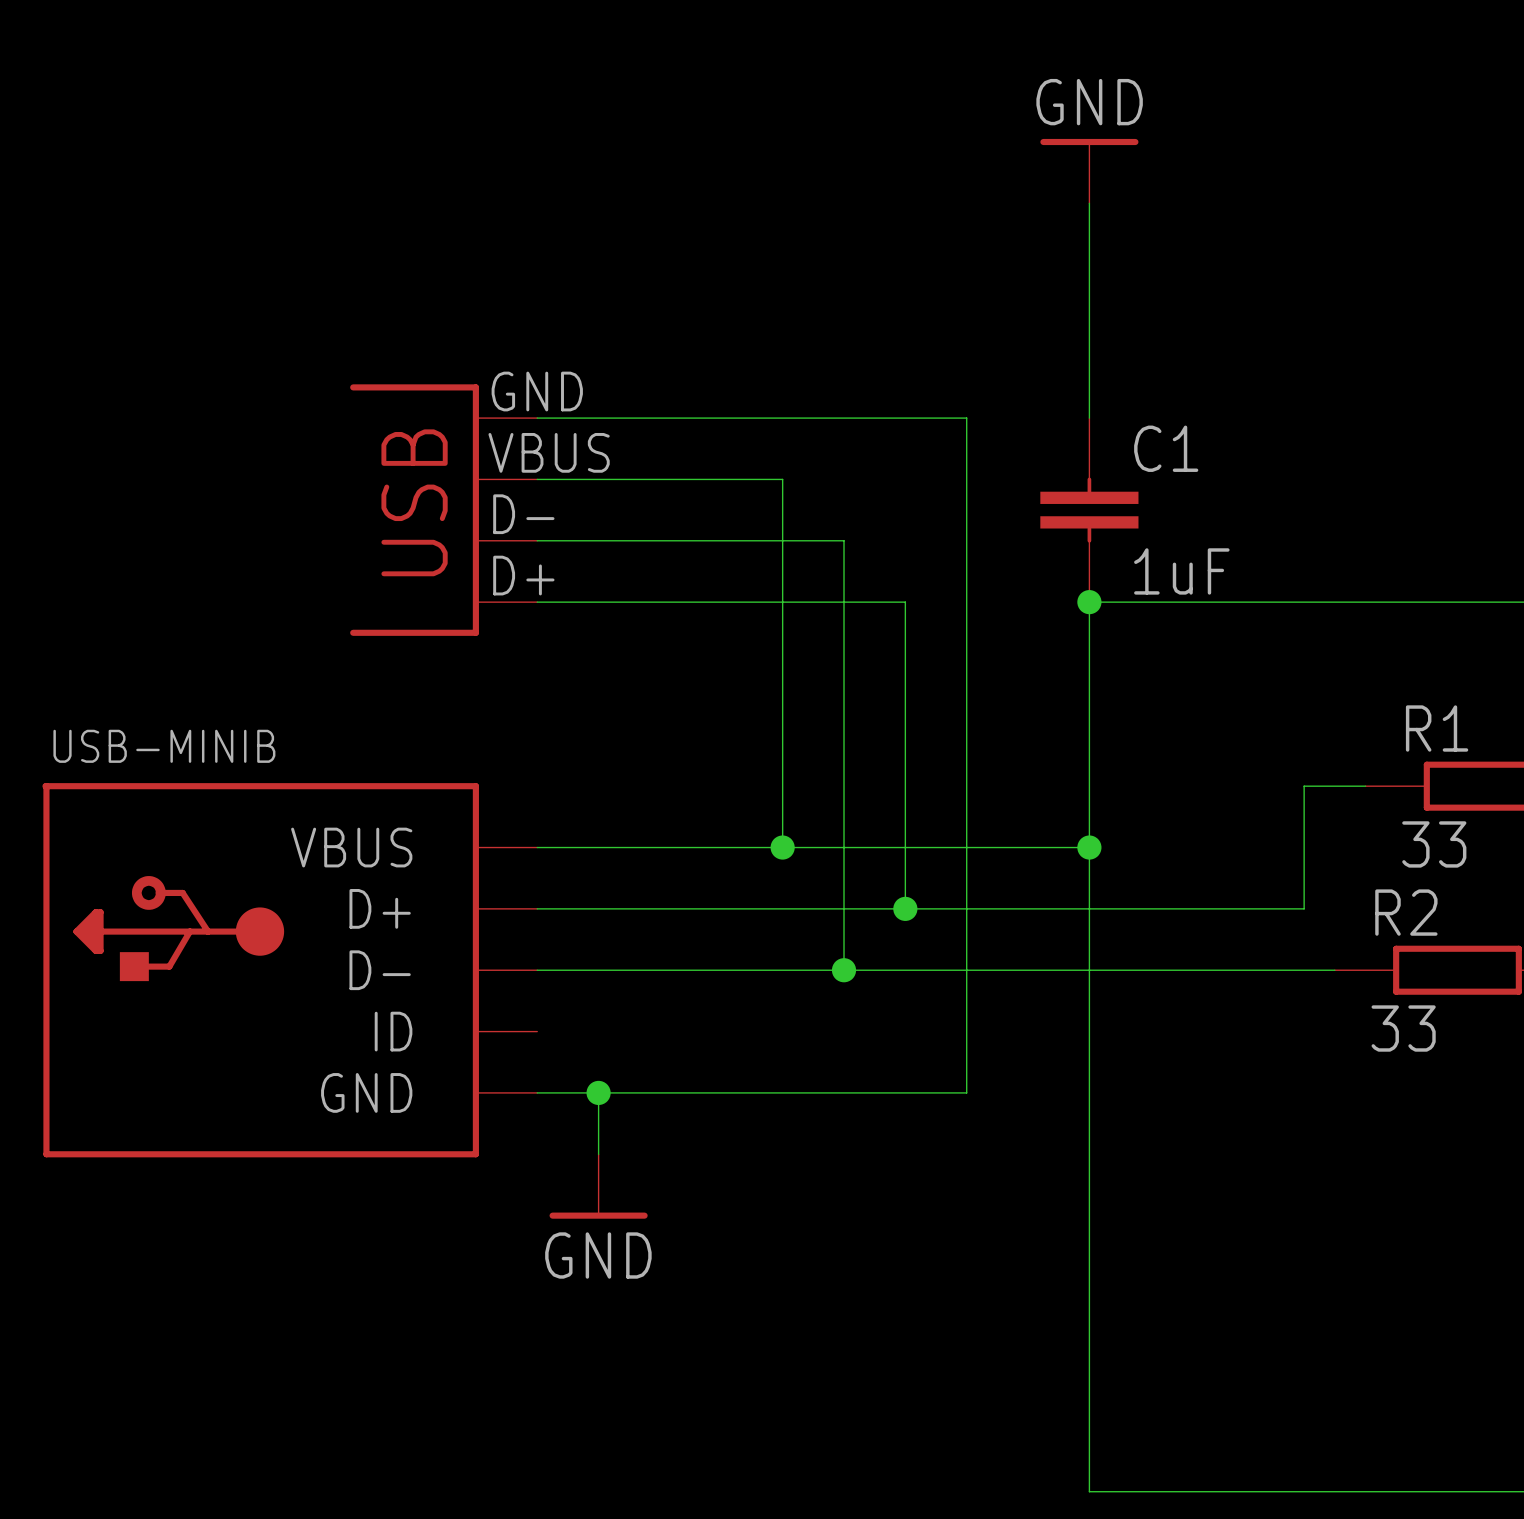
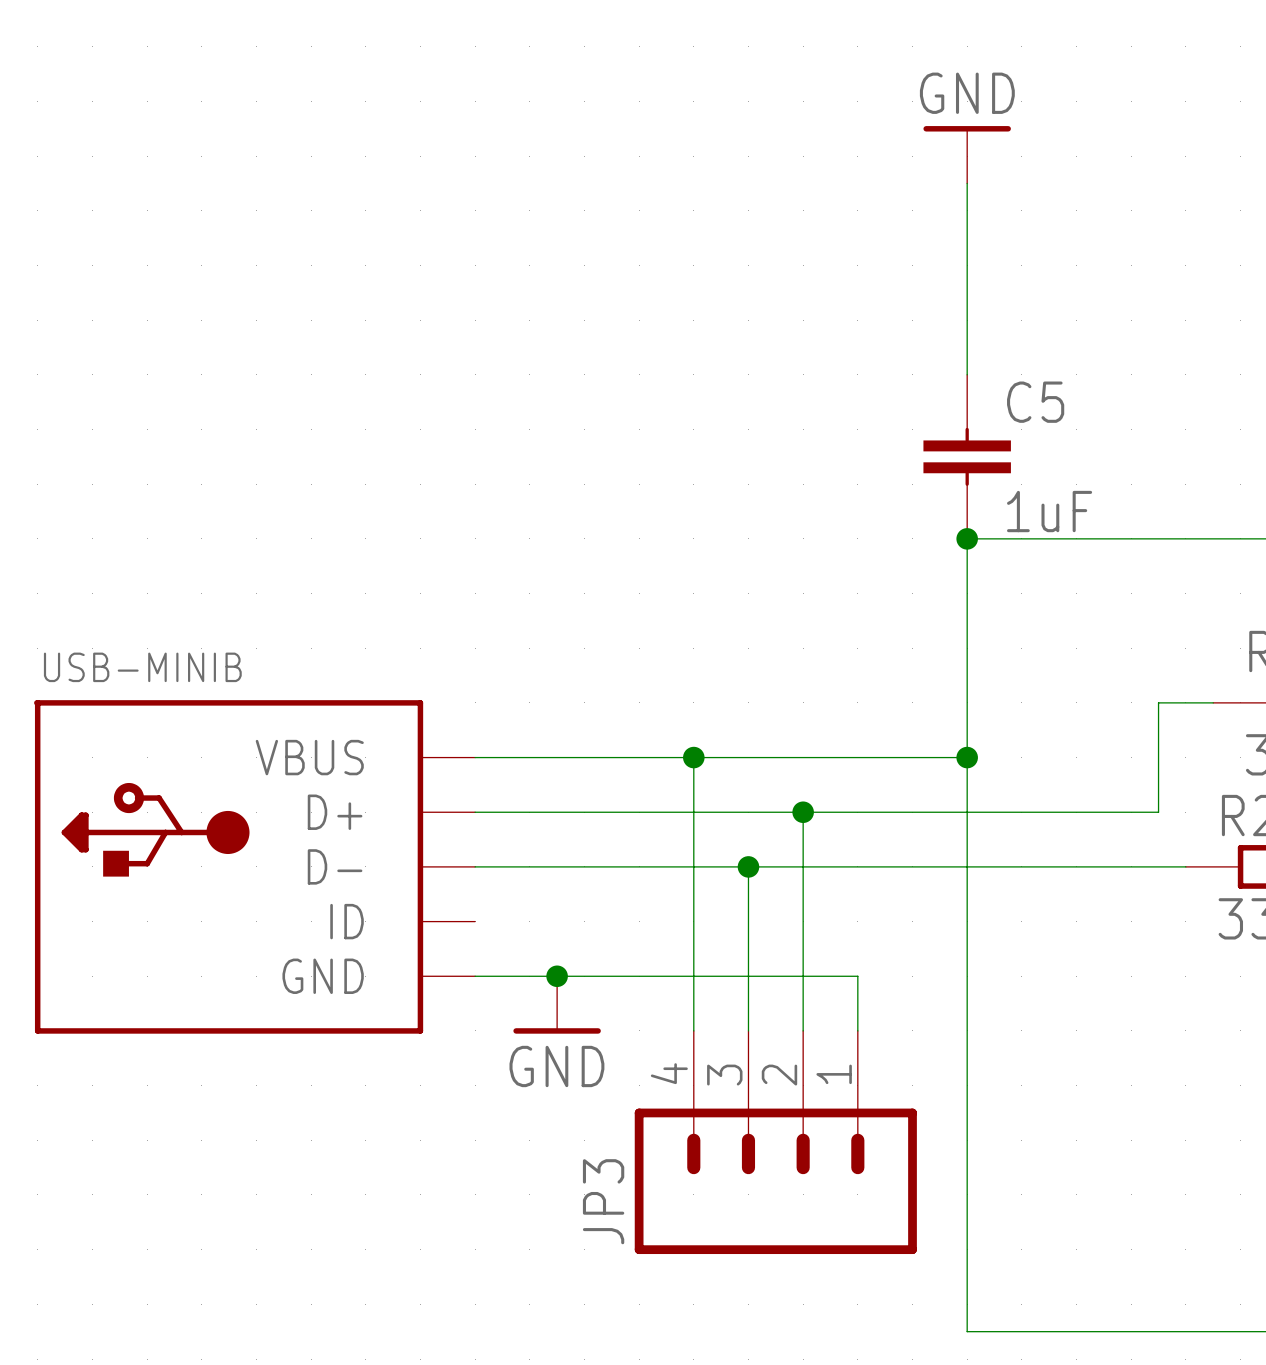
wire: (537, 418) (966, 418) (966, 1092) -> (857, 1030) (857, 976)
C1 name: C1 (1166, 448) -> C5 (1035, 402)
wire: (537, 479) (782, 479) (782, 847) -> (693, 1030) (693, 757)
part: (443, 510) -> none
wire: (537, 540) (844, 540) (844, 970) -> (748, 1030) (748, 866)
wire: (537, 602) (905, 602) (905, 908) -> (803, 1030) (803, 812)
wire: (598, 1092) (598, 1154) -> none
junction position: (598, 1092) -> (557, 976)
power symbol position: GND (598, 1186) -> GND (557, 1004)
JP3: none -> (775, 1142)

